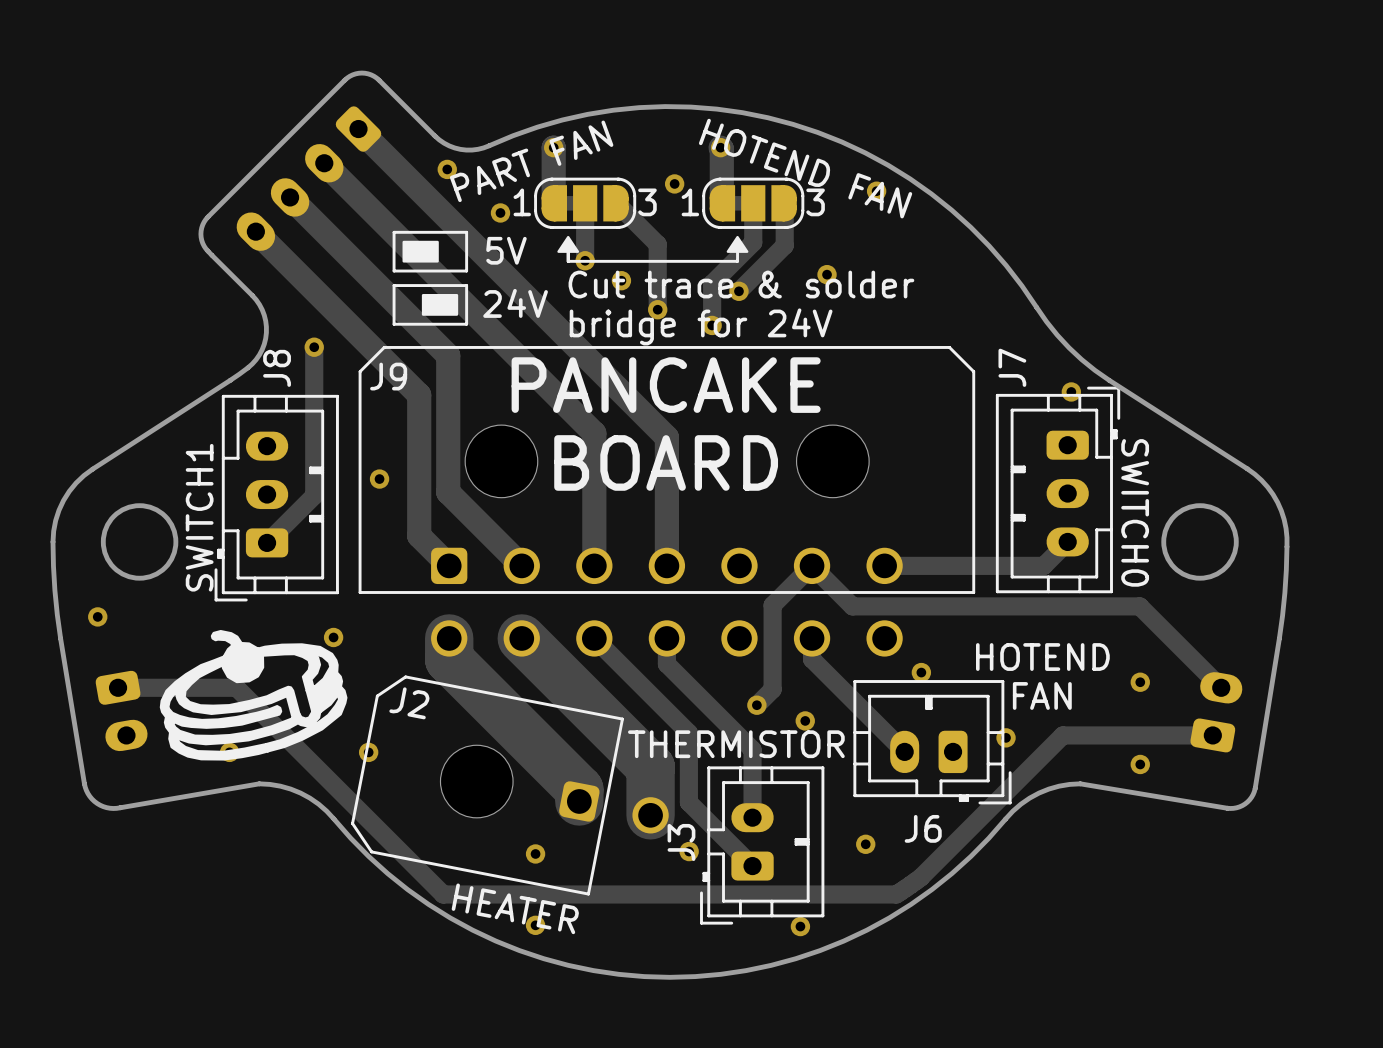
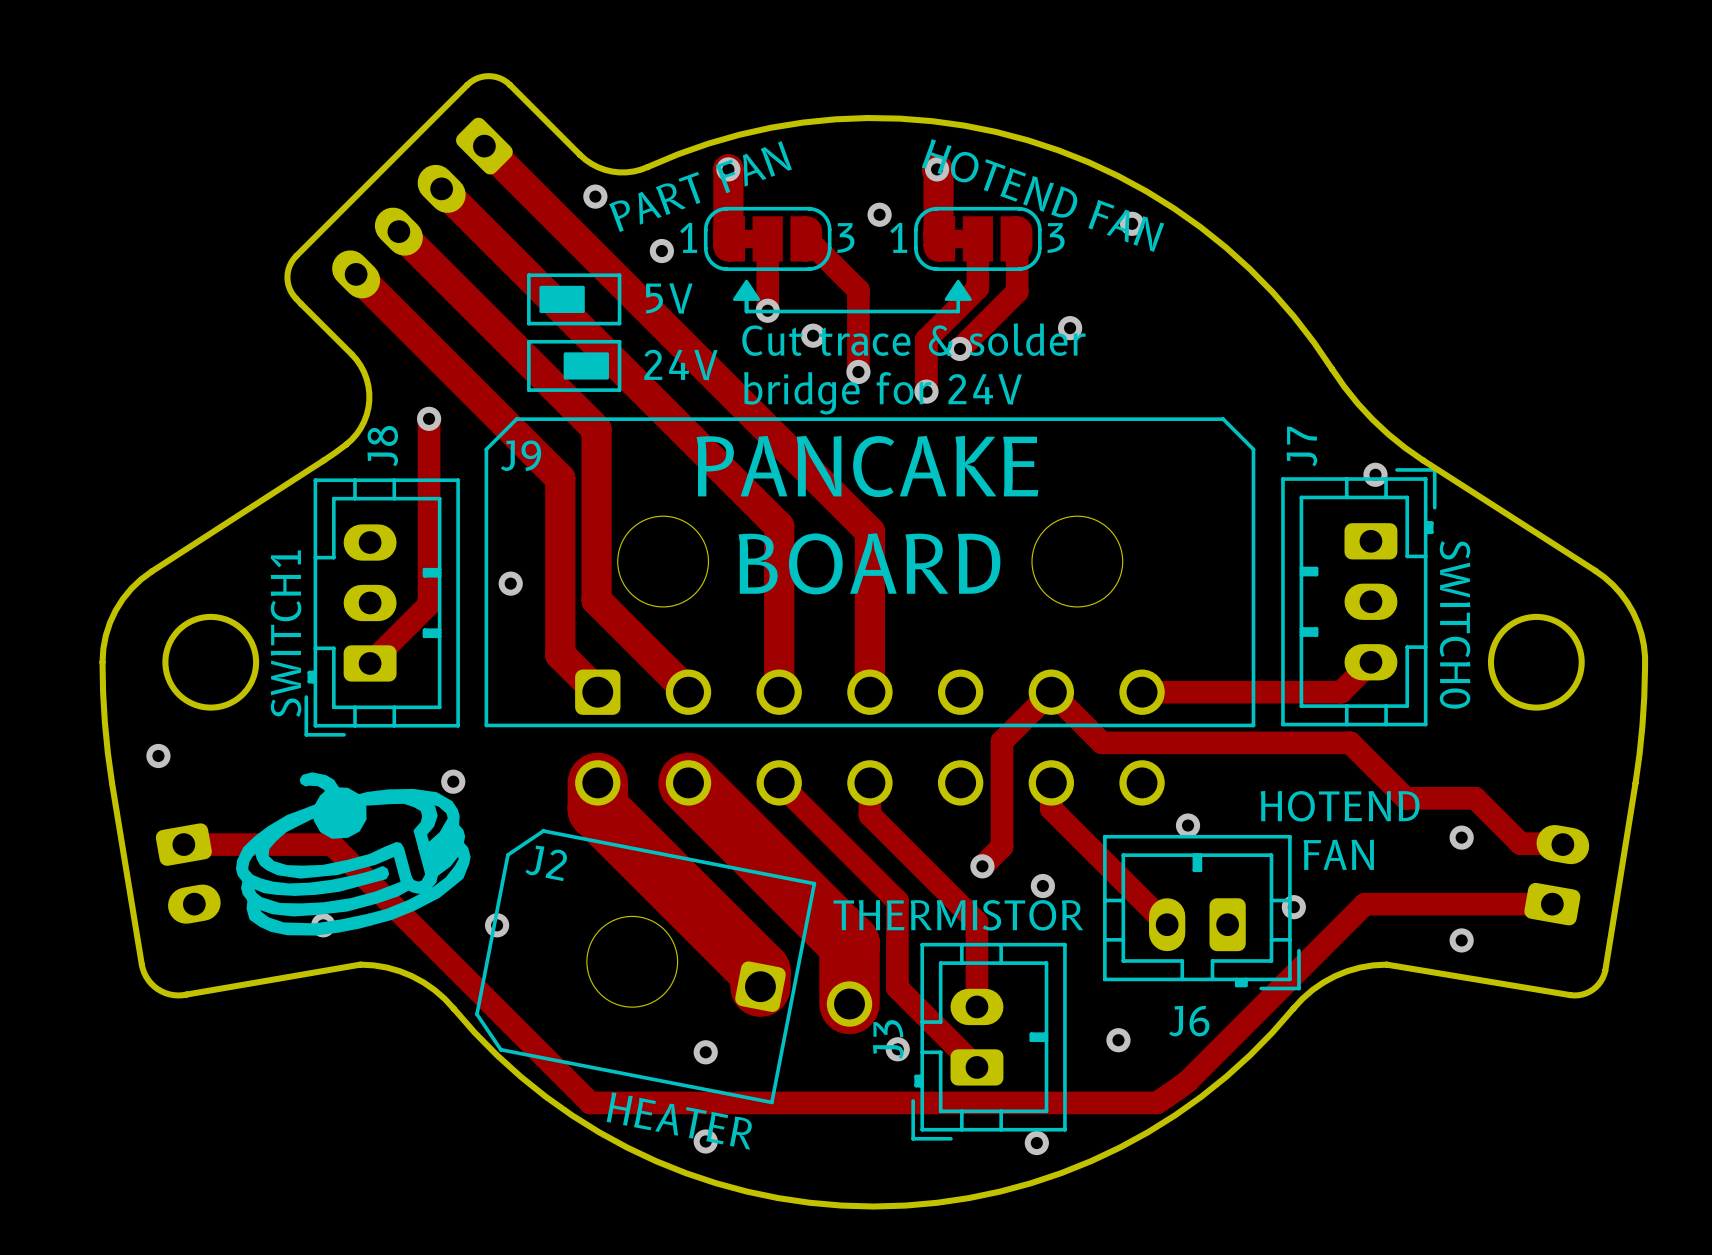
track: (1051, 606) (1139, 606) (1220, 687) -> (1350, 742) (1405, 798) (1475, 798) (1520, 843) (1561, 843)

